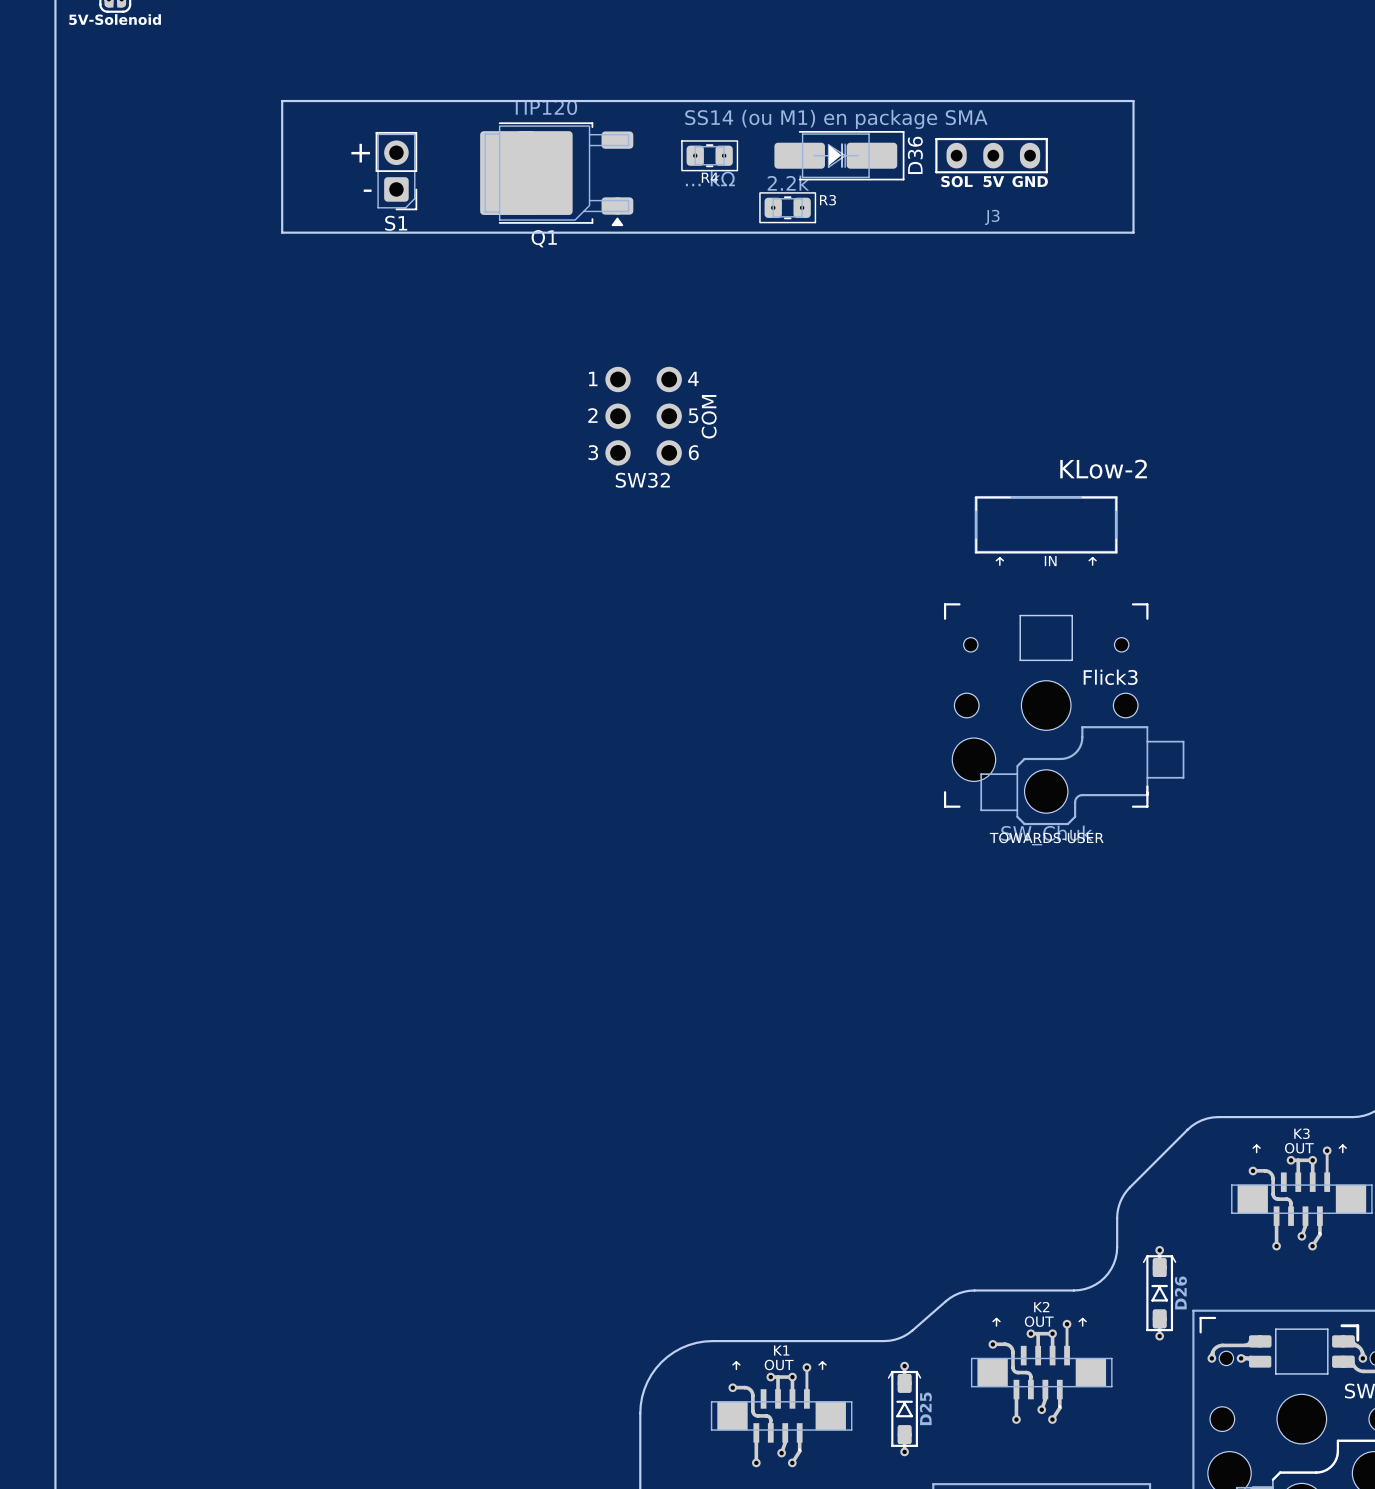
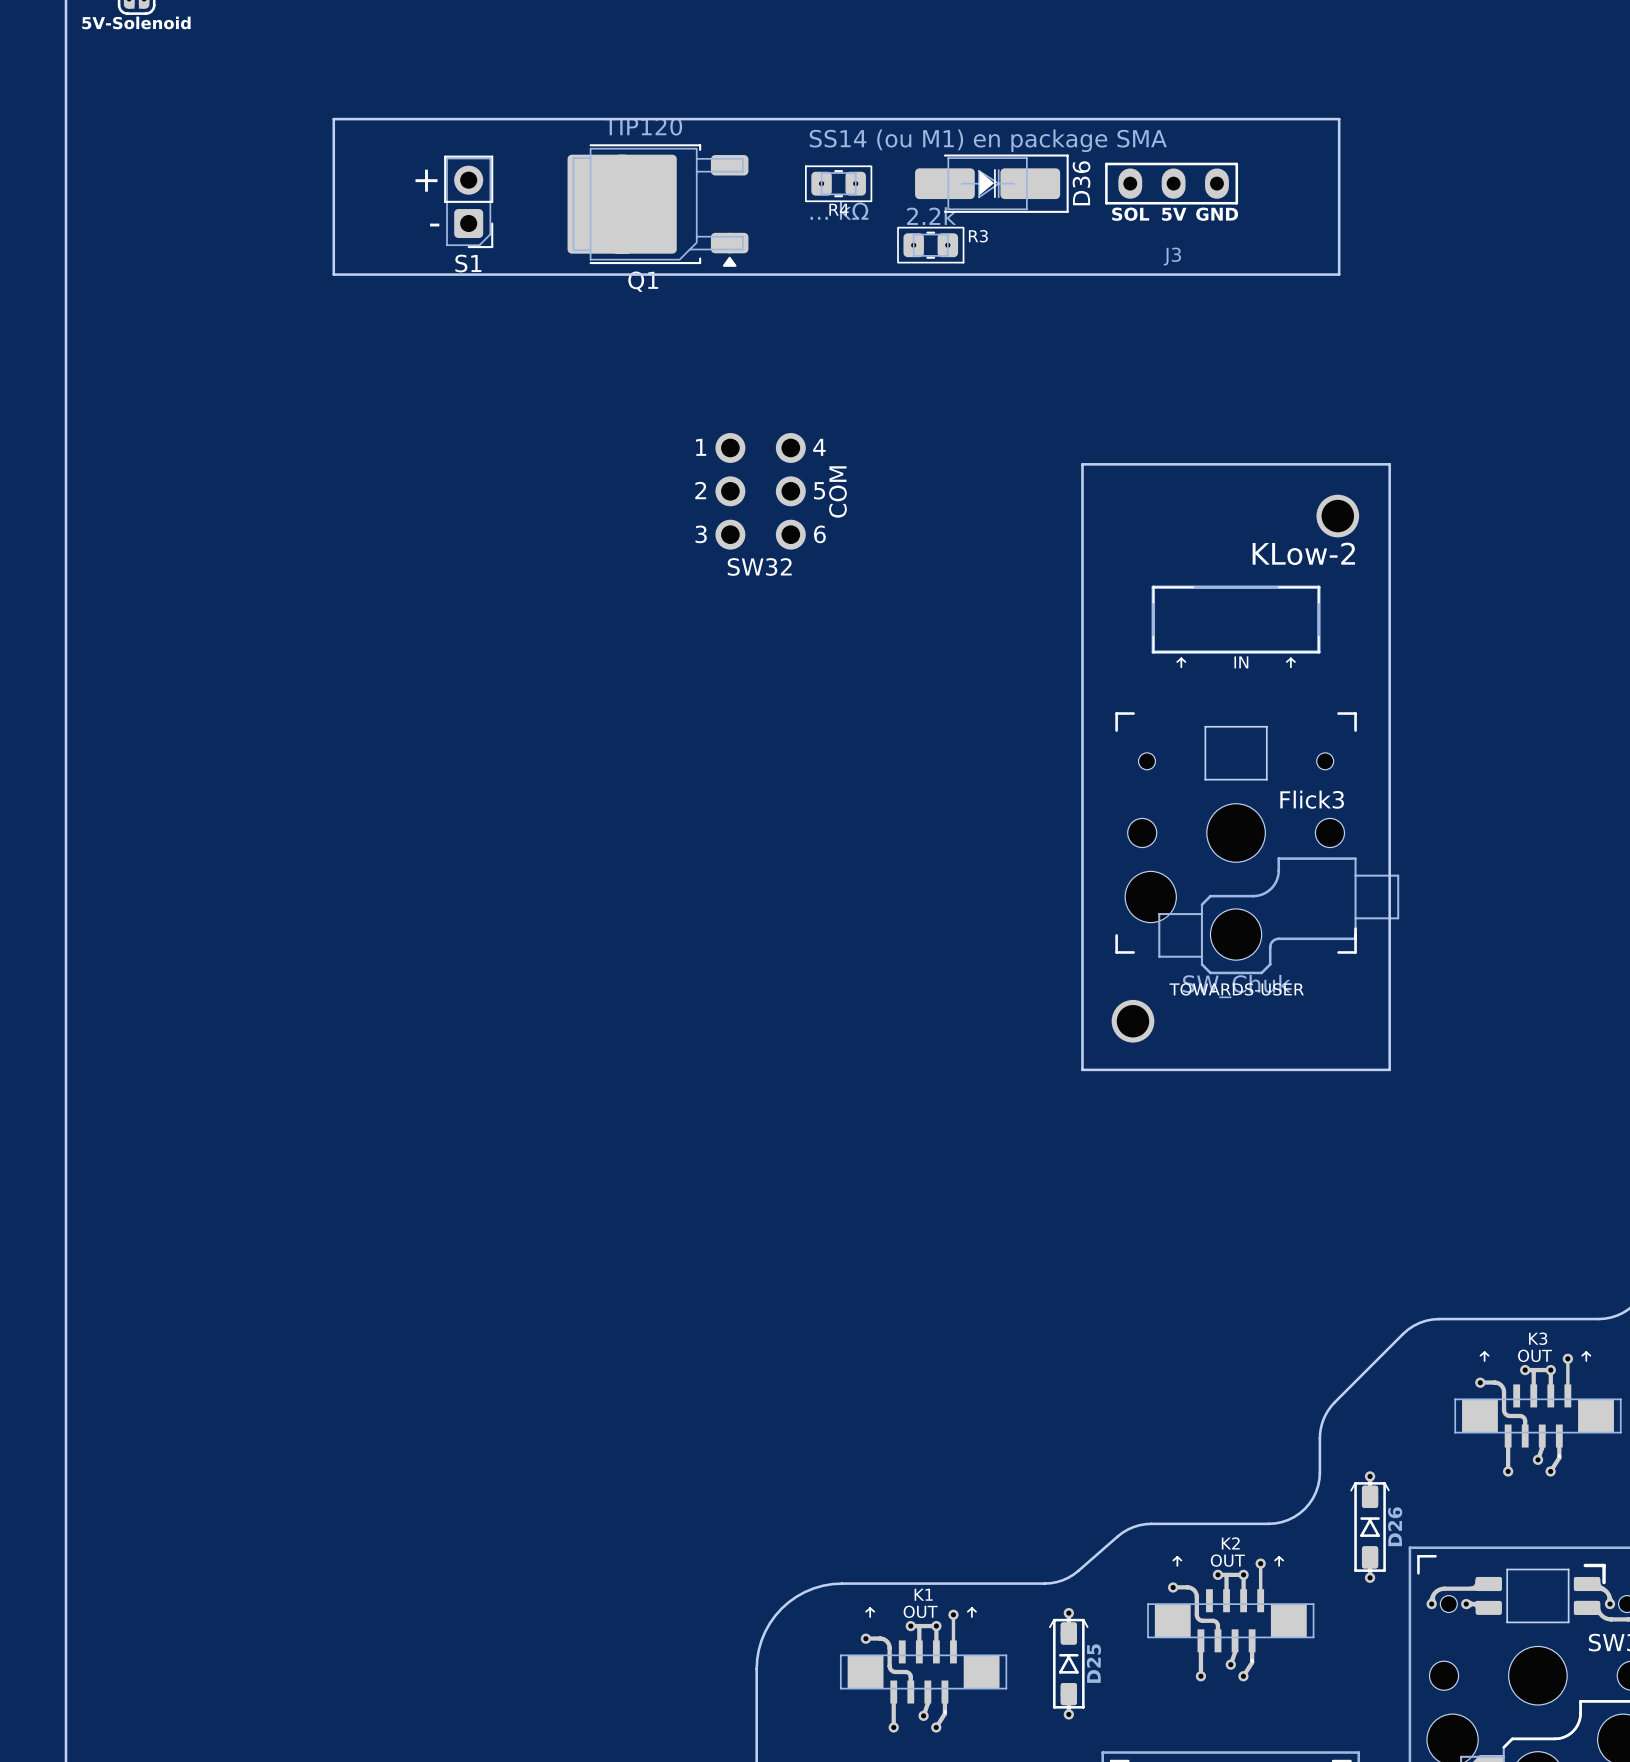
board edge: none -> (1082, 464) (1389, 464) (1389, 1069) (1082, 1069) (1082, 464)
part: none -> (1337, 516)
part: none -> (1133, 1021)

